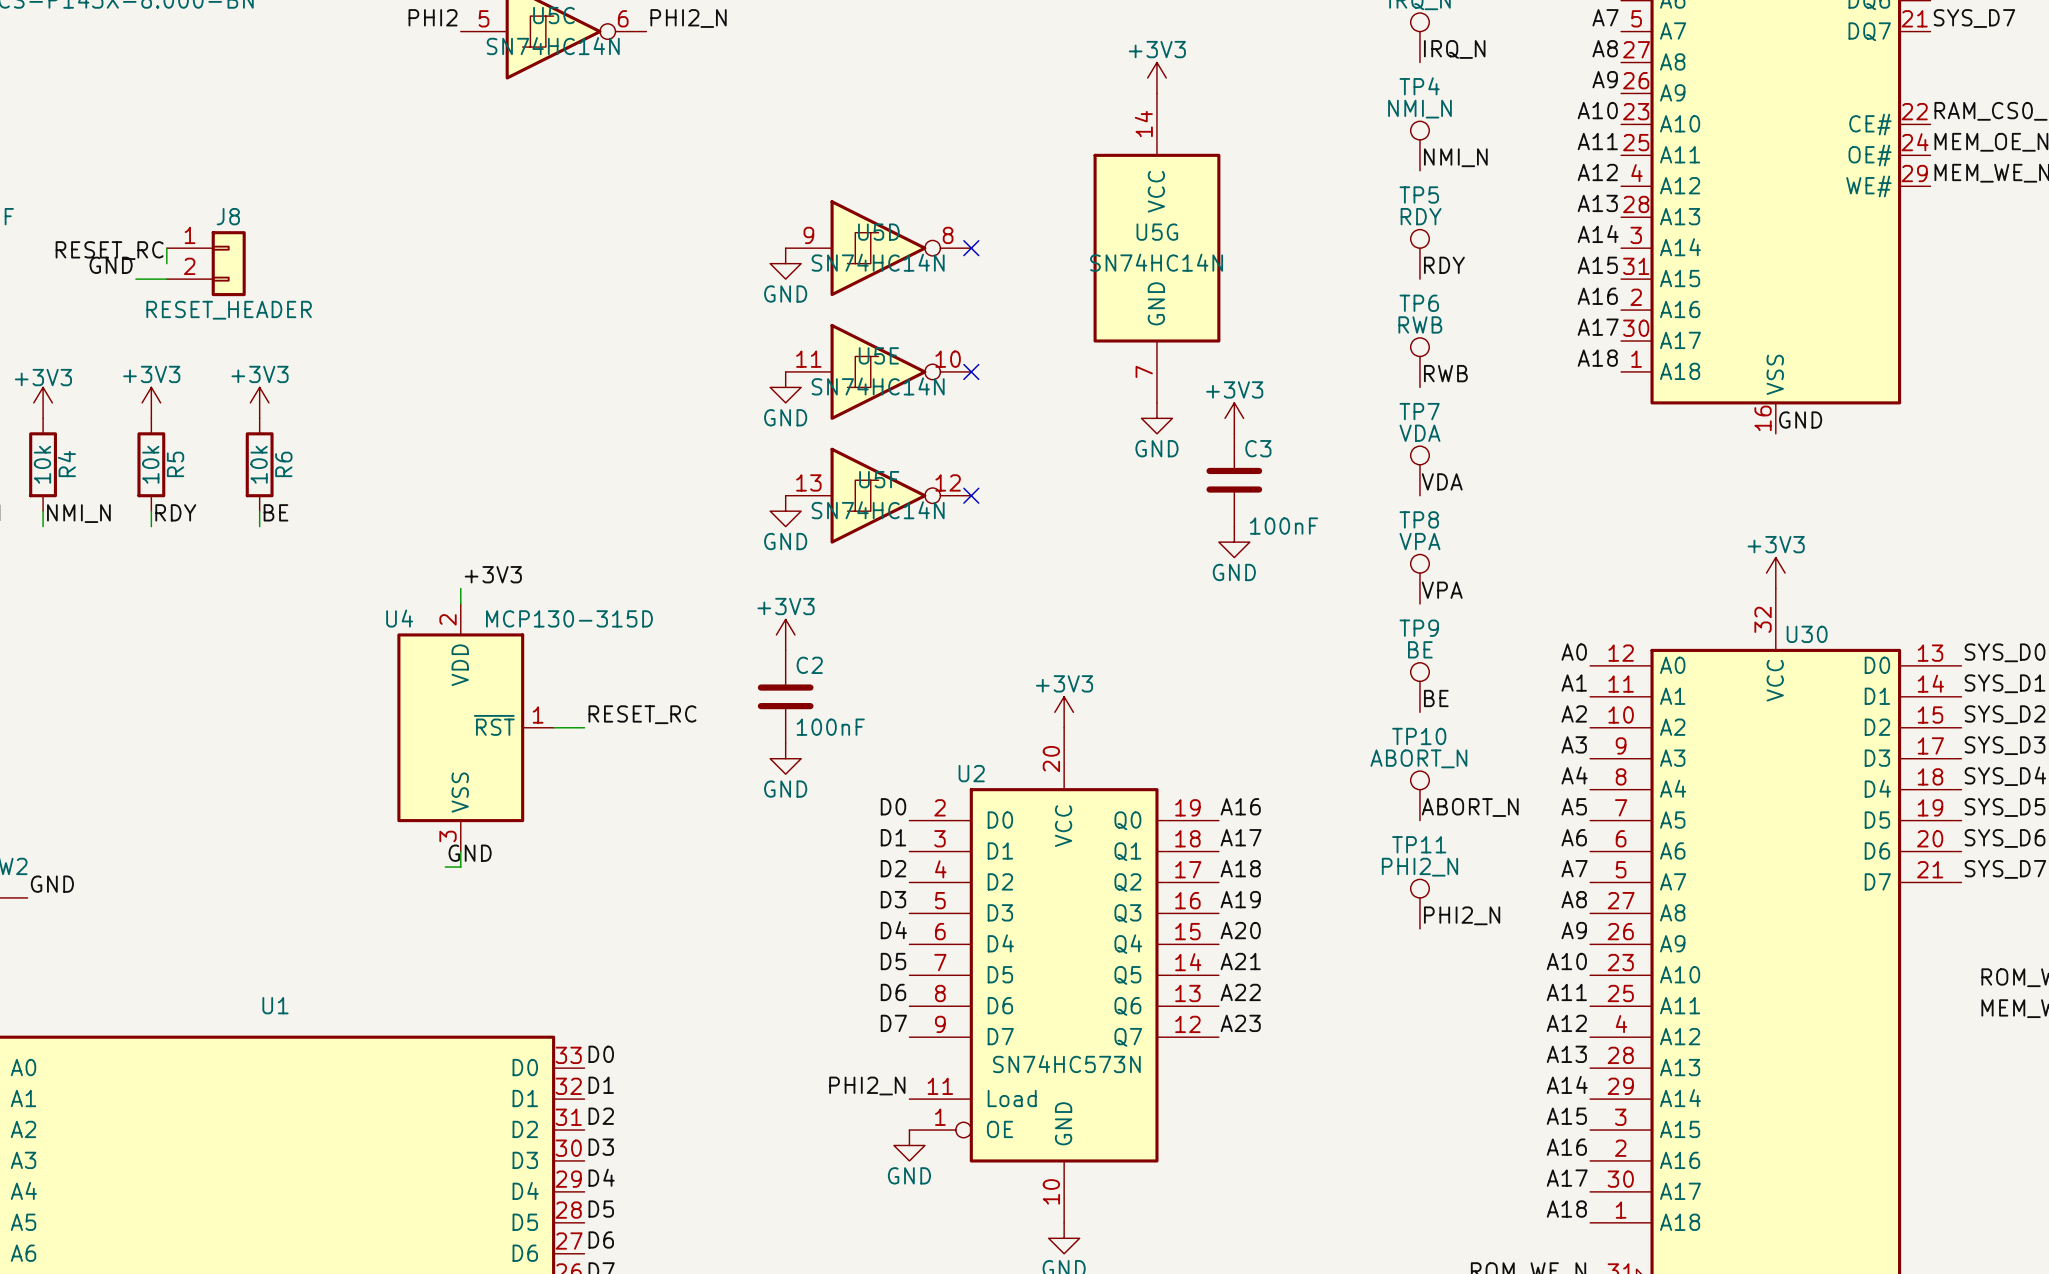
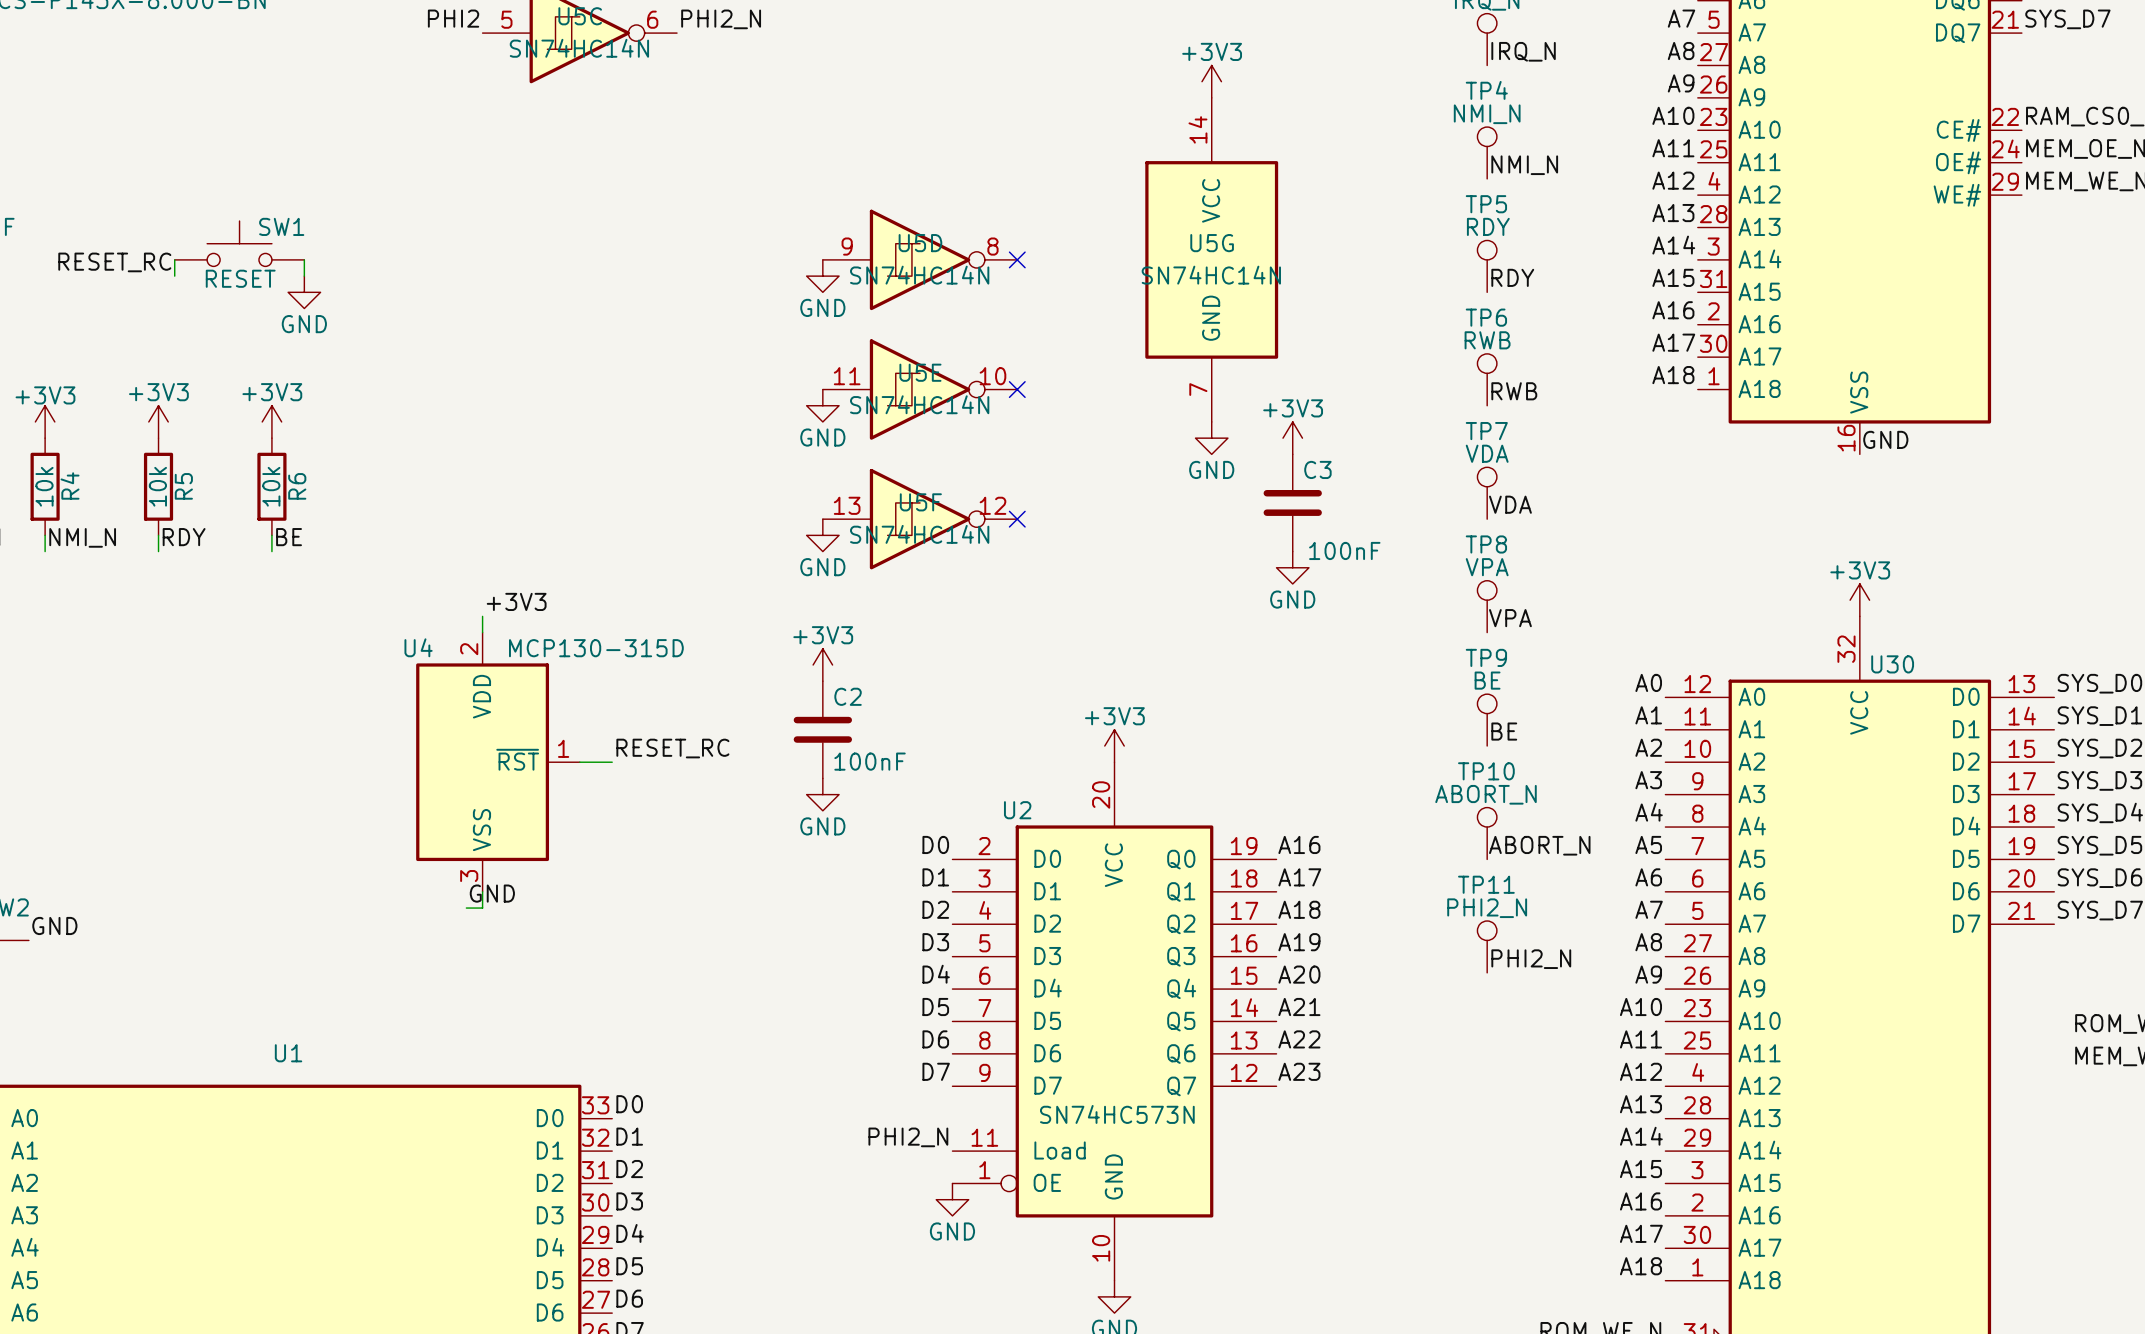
SW1: none -> RESET (239, 243)
wire: none -> (304, 259) (304, 276)
J8: RESET_HEADER (206, 263) -> none
label: GND (111, 265) -> none
wire: (135, 279) (166, 279) -> none
power symbol: none -> GND (304, 292)

